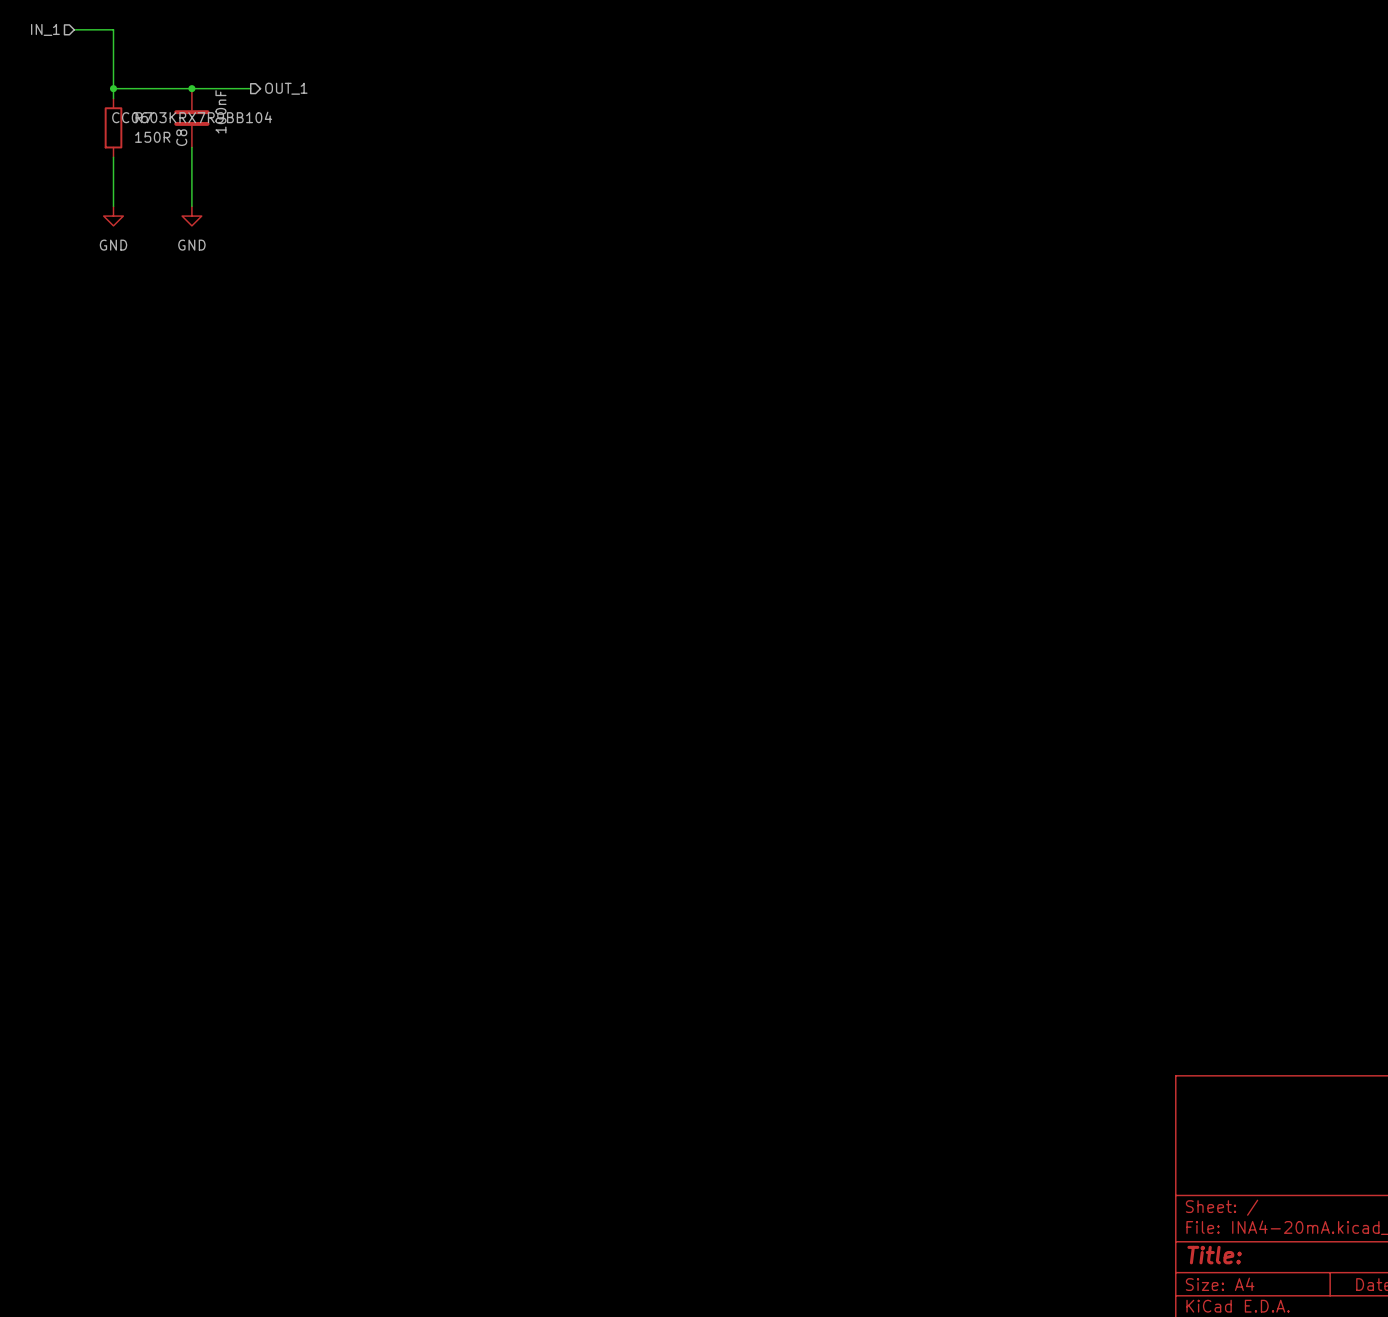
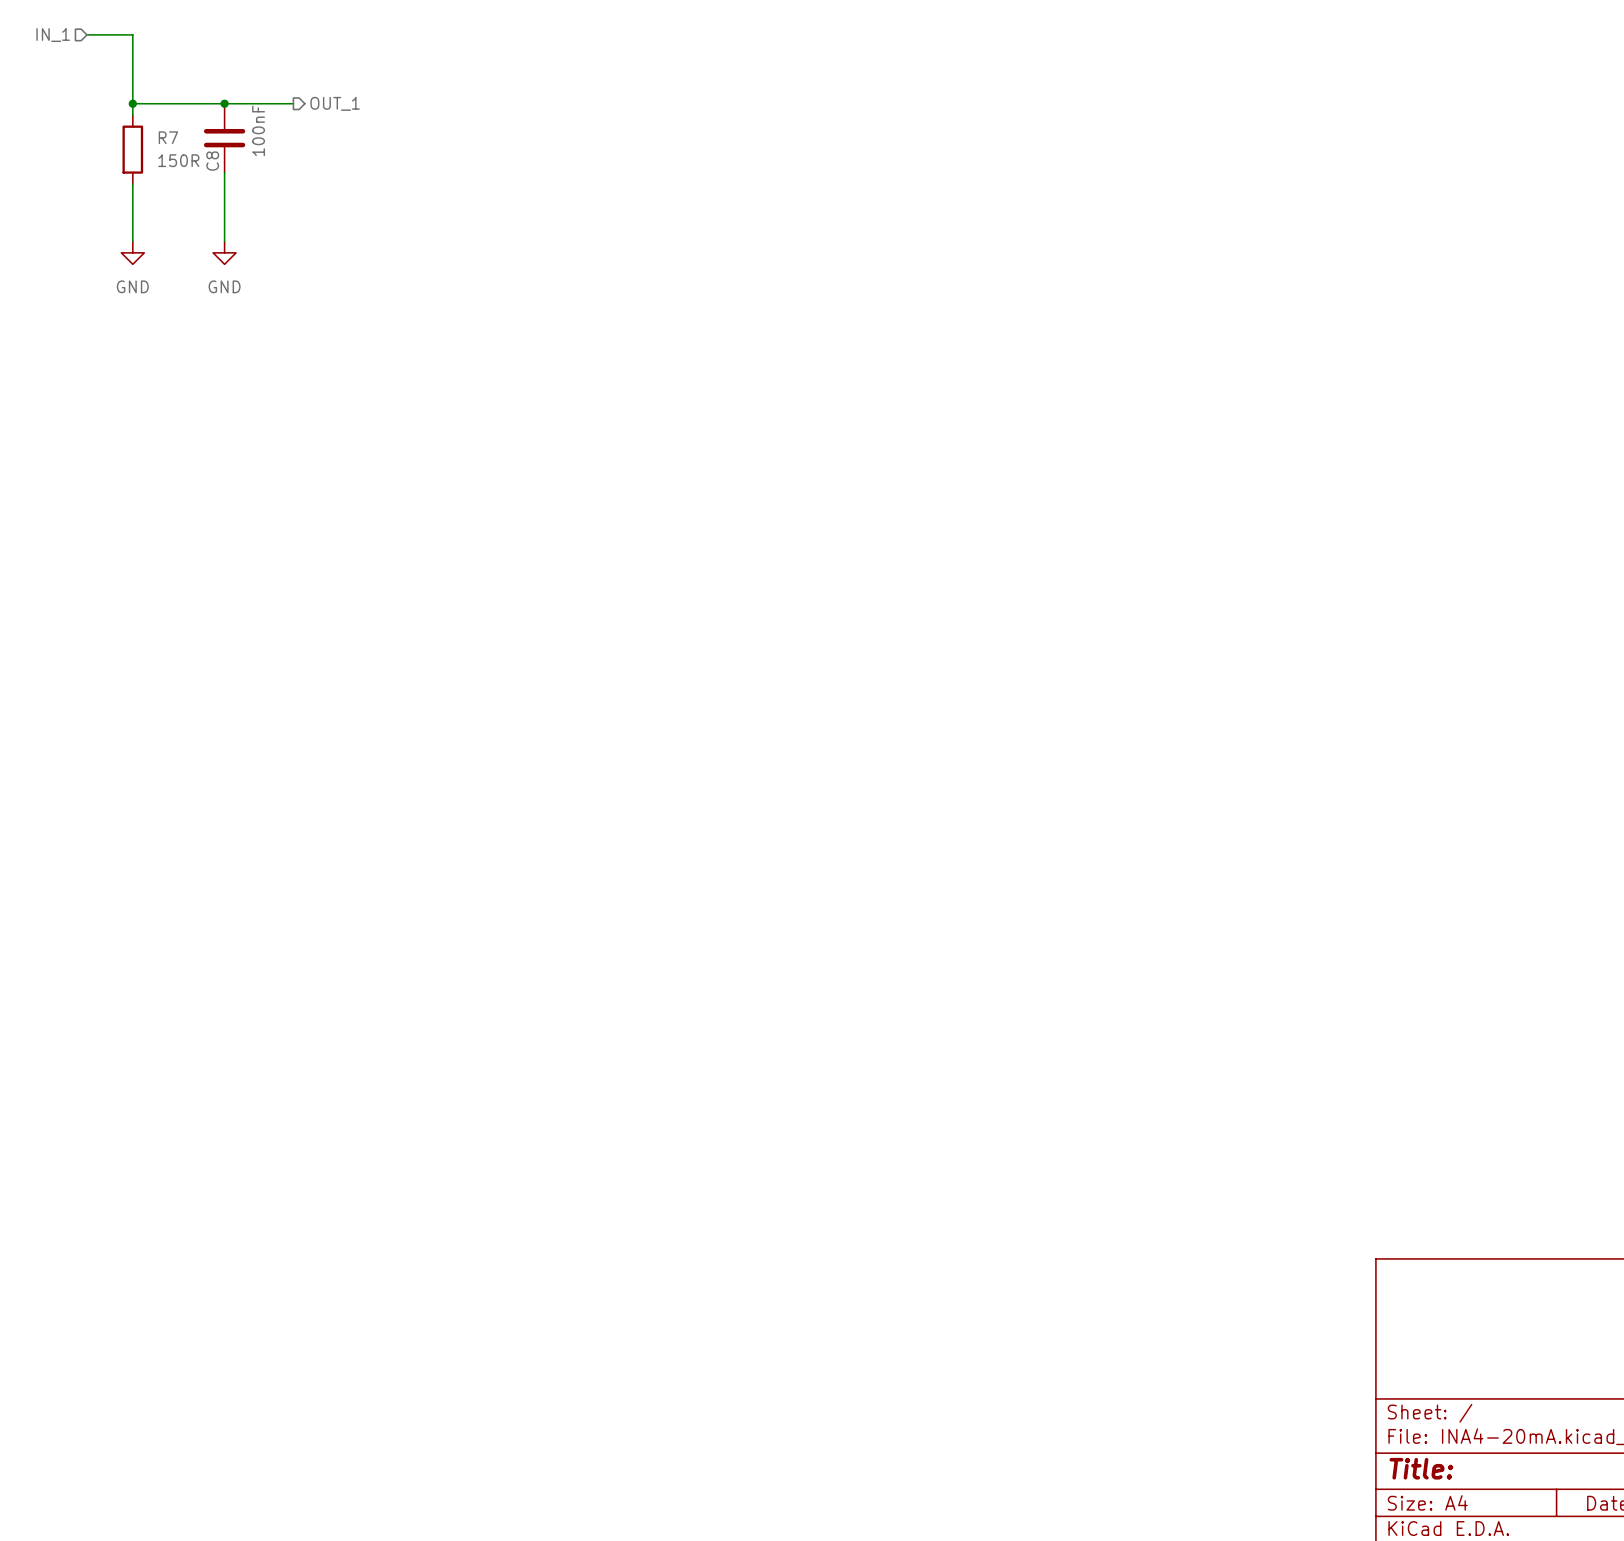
C8 text: CC0603KRX7R9BB104 (192, 117) -> none

